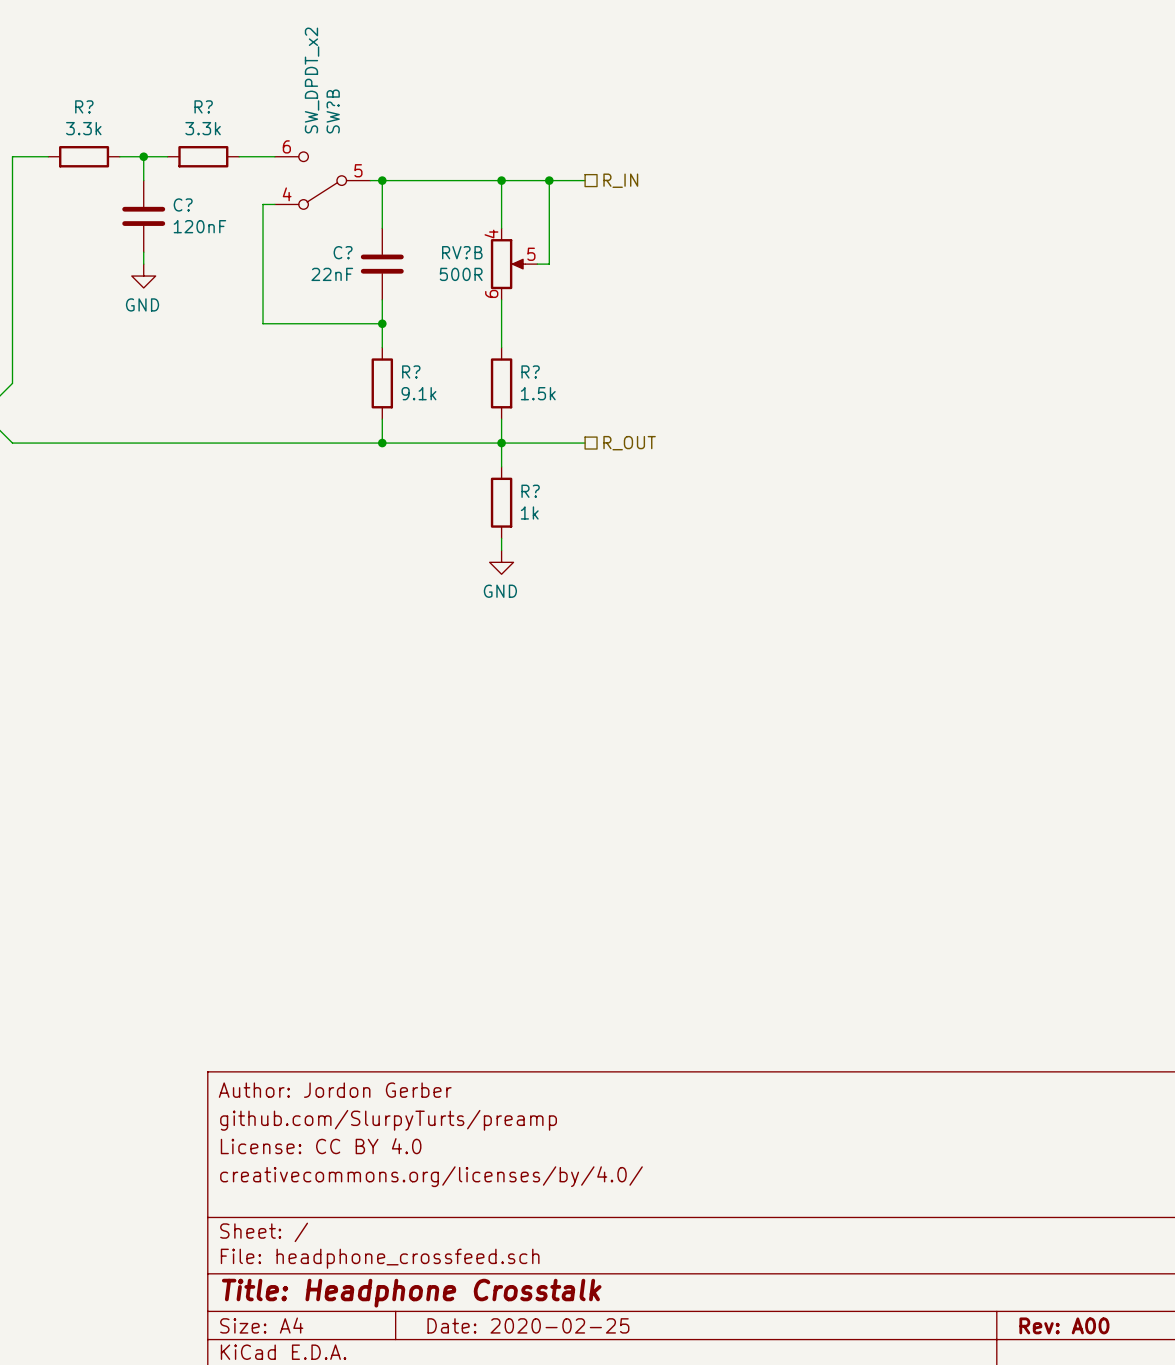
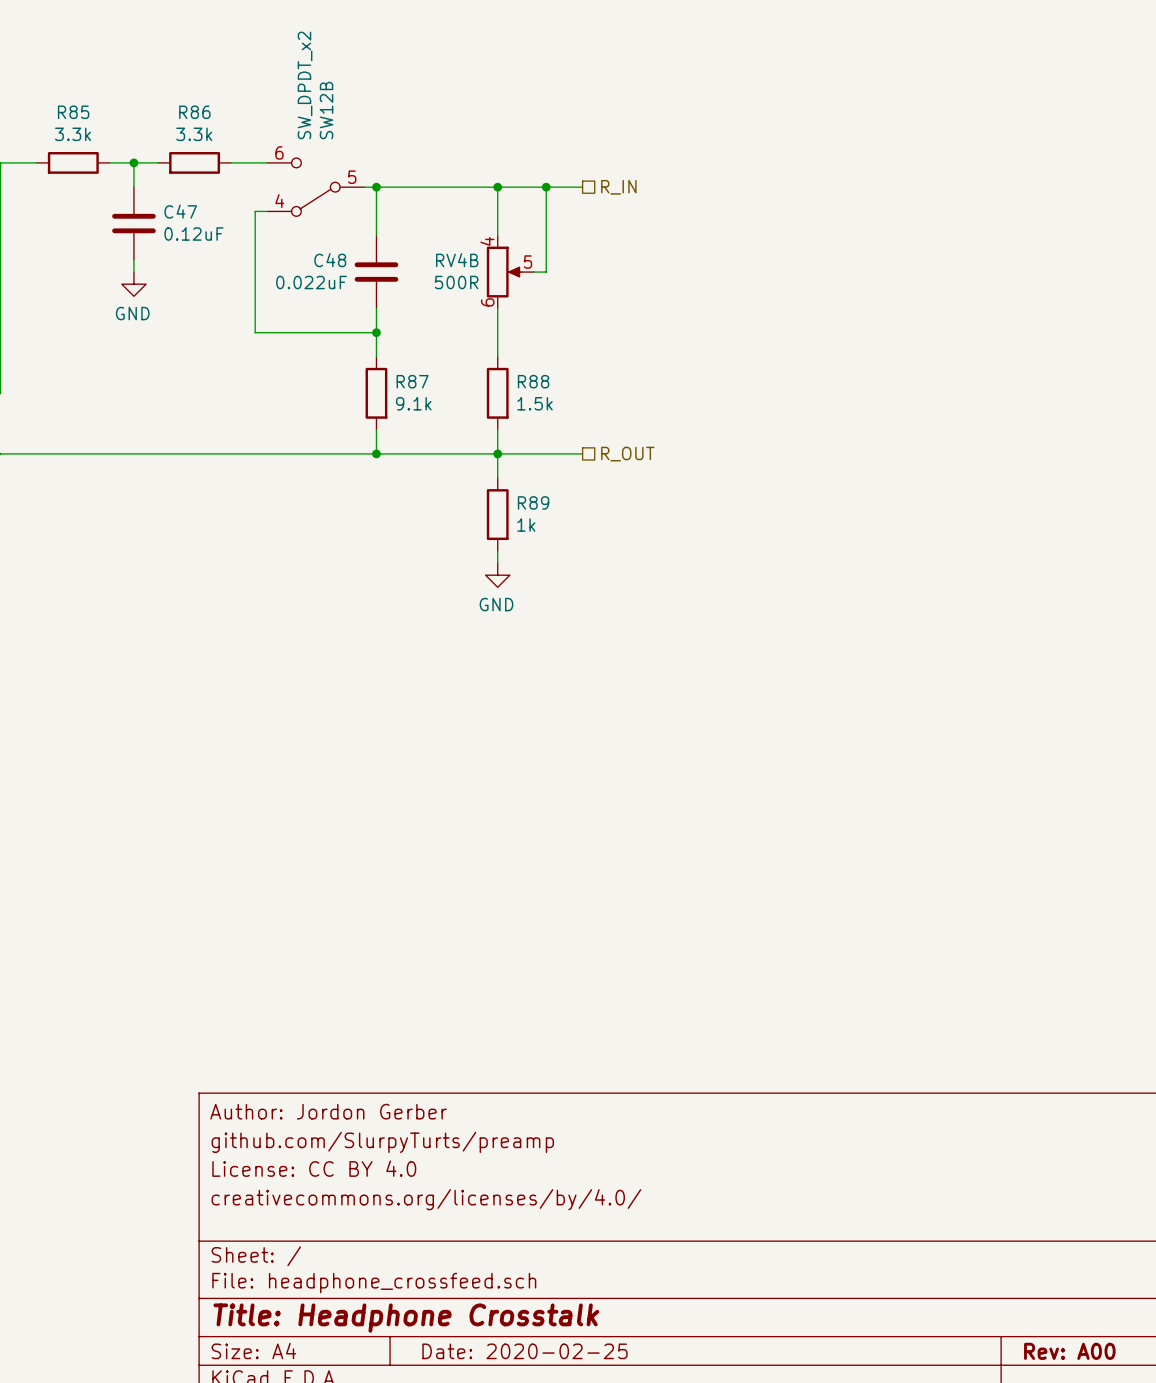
R? name: R? (84, 106) -> R85 (73, 112)
R? name: R? (203, 106) -> R86 (194, 112)
SW?B name: SW?B (333, 111) -> SW12B (326, 110)
C? name: C? (183, 204) -> C47 (180, 211)
C? value: 120nF (199, 226) -> 0.12uF (193, 234)
C? name: C? (343, 252) -> C48 (330, 260)
RV?B name: RV?B (462, 252) -> RV4B (457, 260)
C? value: 22nF (332, 274) -> 0.022uF (311, 282)
R? name: R? (411, 371) -> R87 (412, 381)
R? name: R? (530, 371) -> R88 (533, 381)
R? name: R? (530, 491) -> R89 (533, 502)

